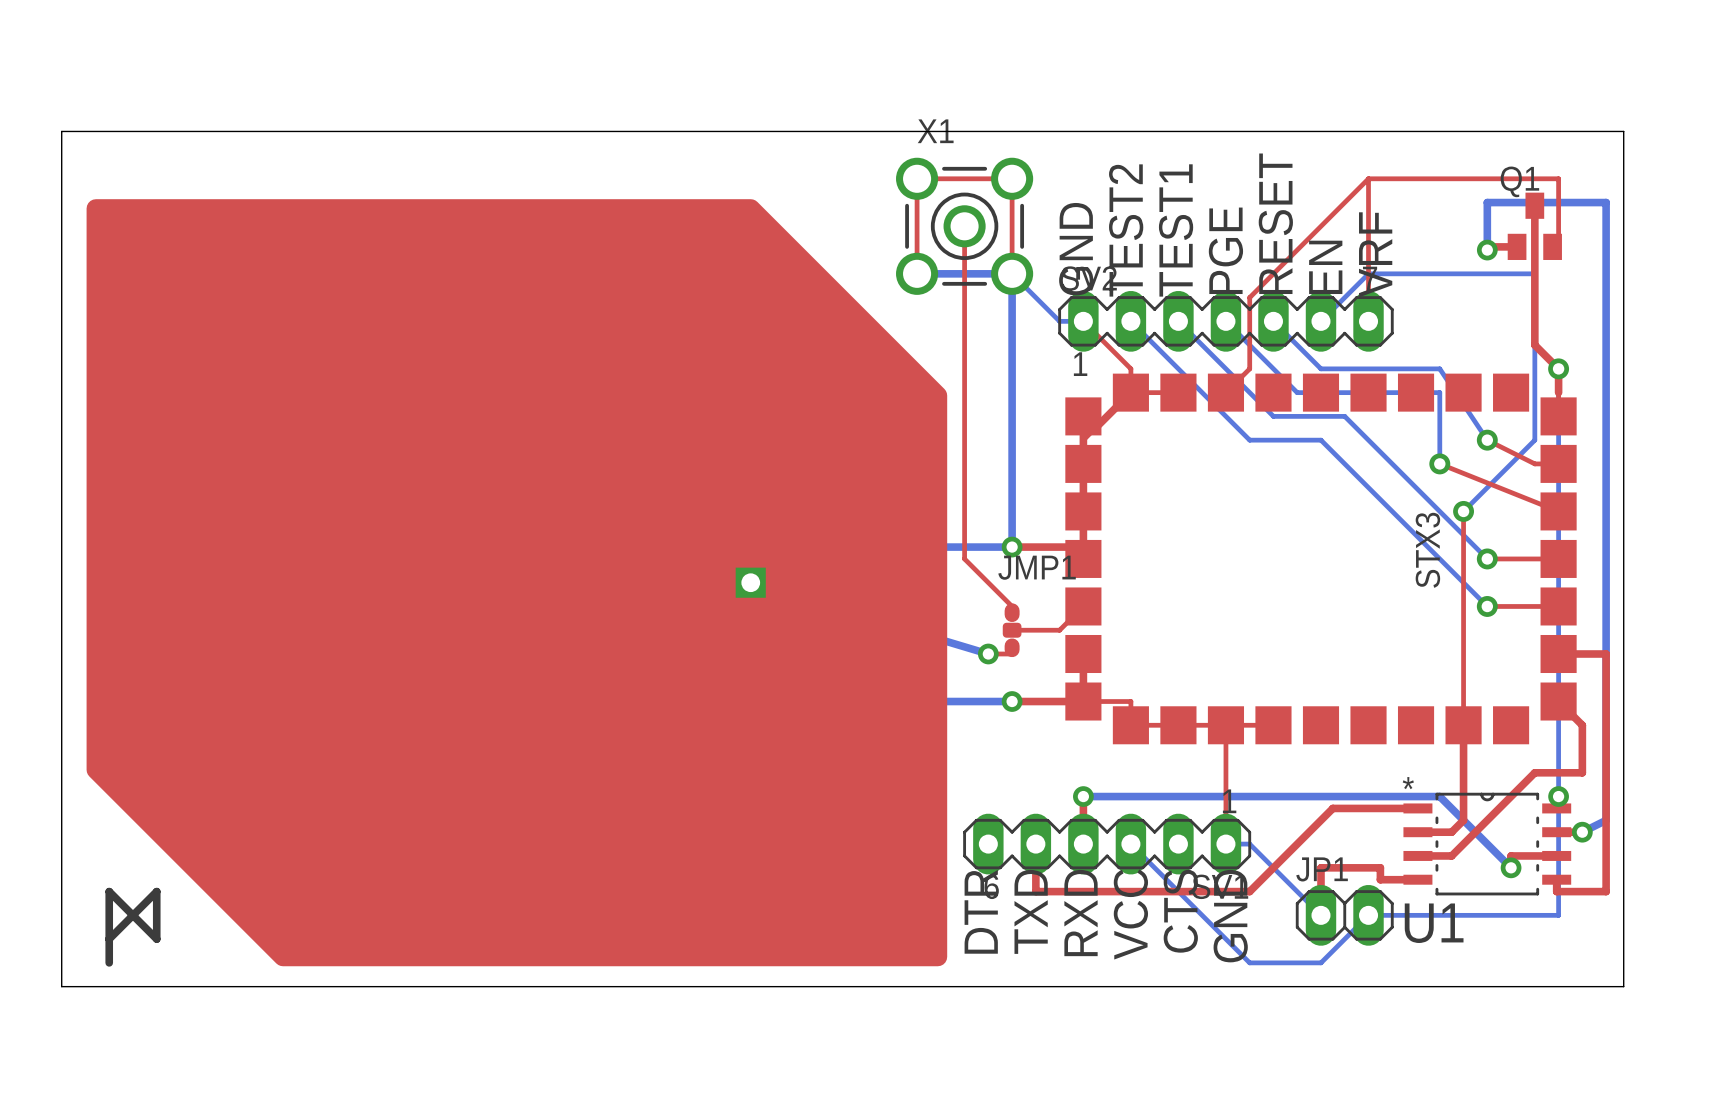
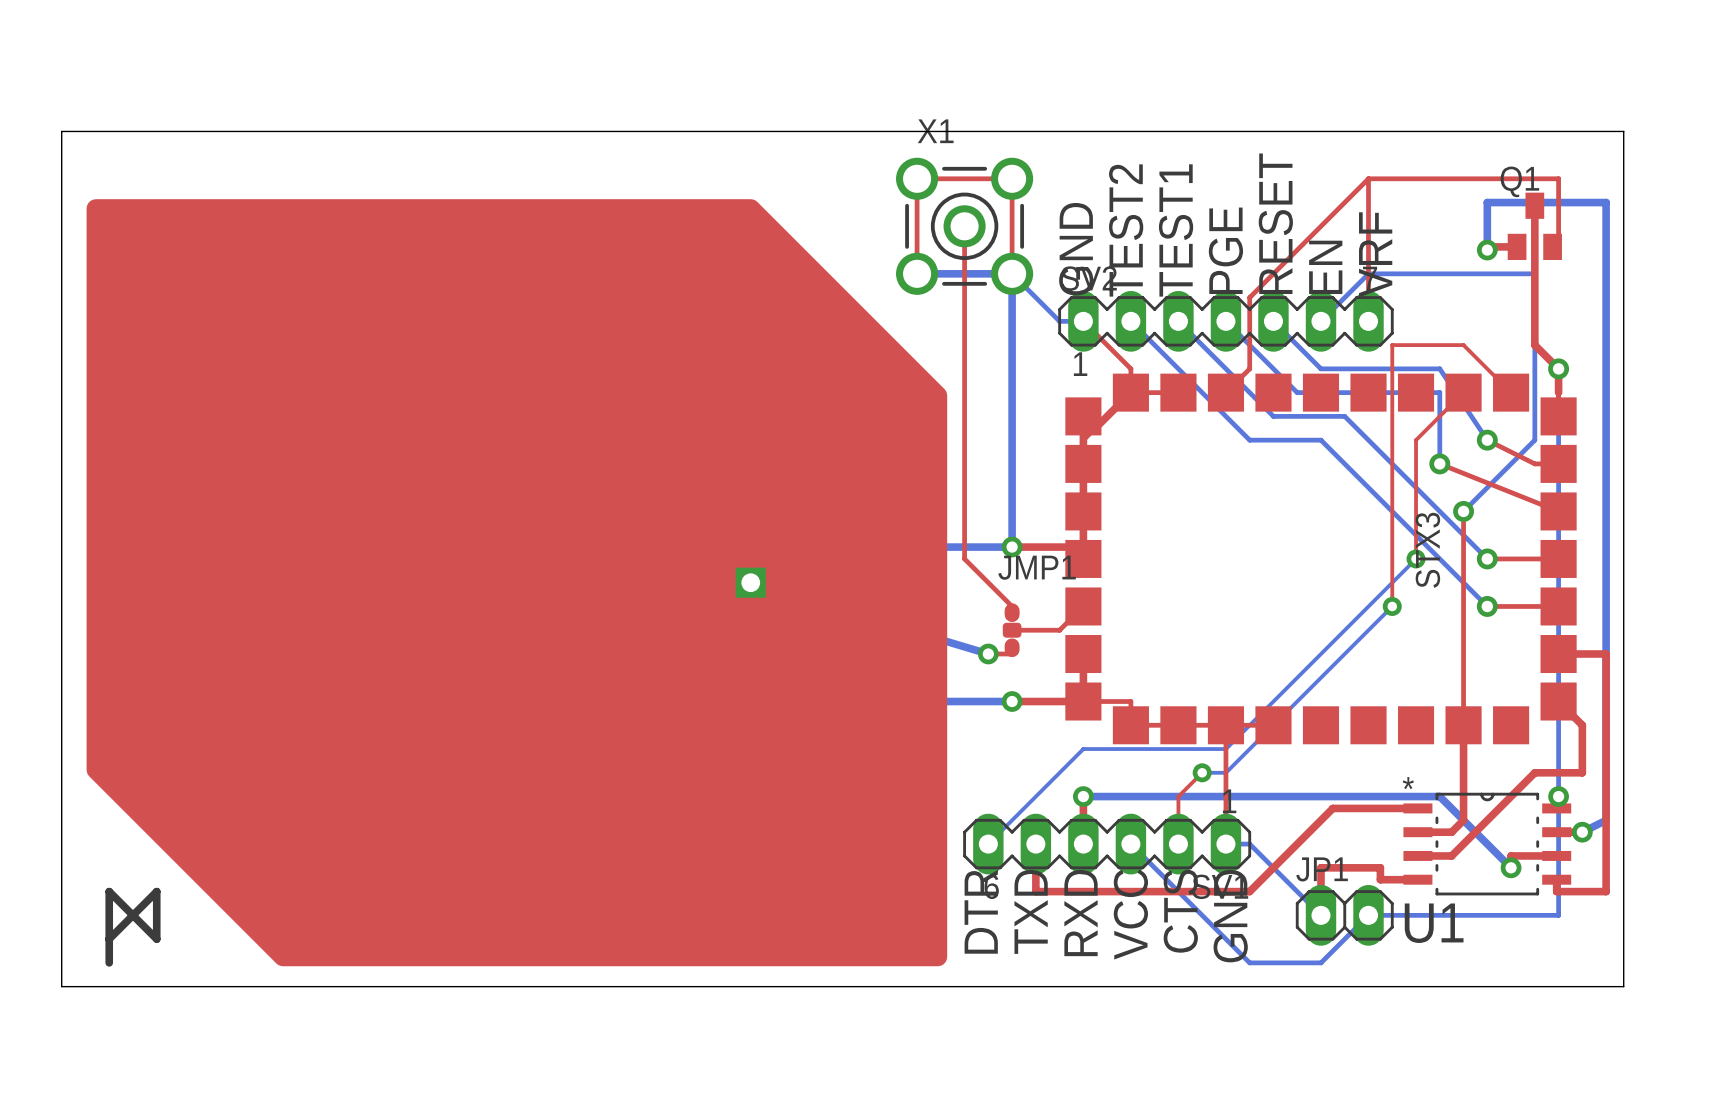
top track: none -> (1463, 392) (1416, 440) (1416, 558)
top track: none -> (1511, 392) (1463, 345) (1392, 345) (1392, 606)
bottom track: none -> (1416, 558) (1225, 749) (1083, 749) (988, 844)
via: none -> (1416, 558)
bottom track: none -> (1392, 606) (1225, 772) (1202, 772)
via: none -> (1392, 606)
top track: none -> (1202, 772) (1178, 796) (1178, 844)
via: none -> (1202, 772)

